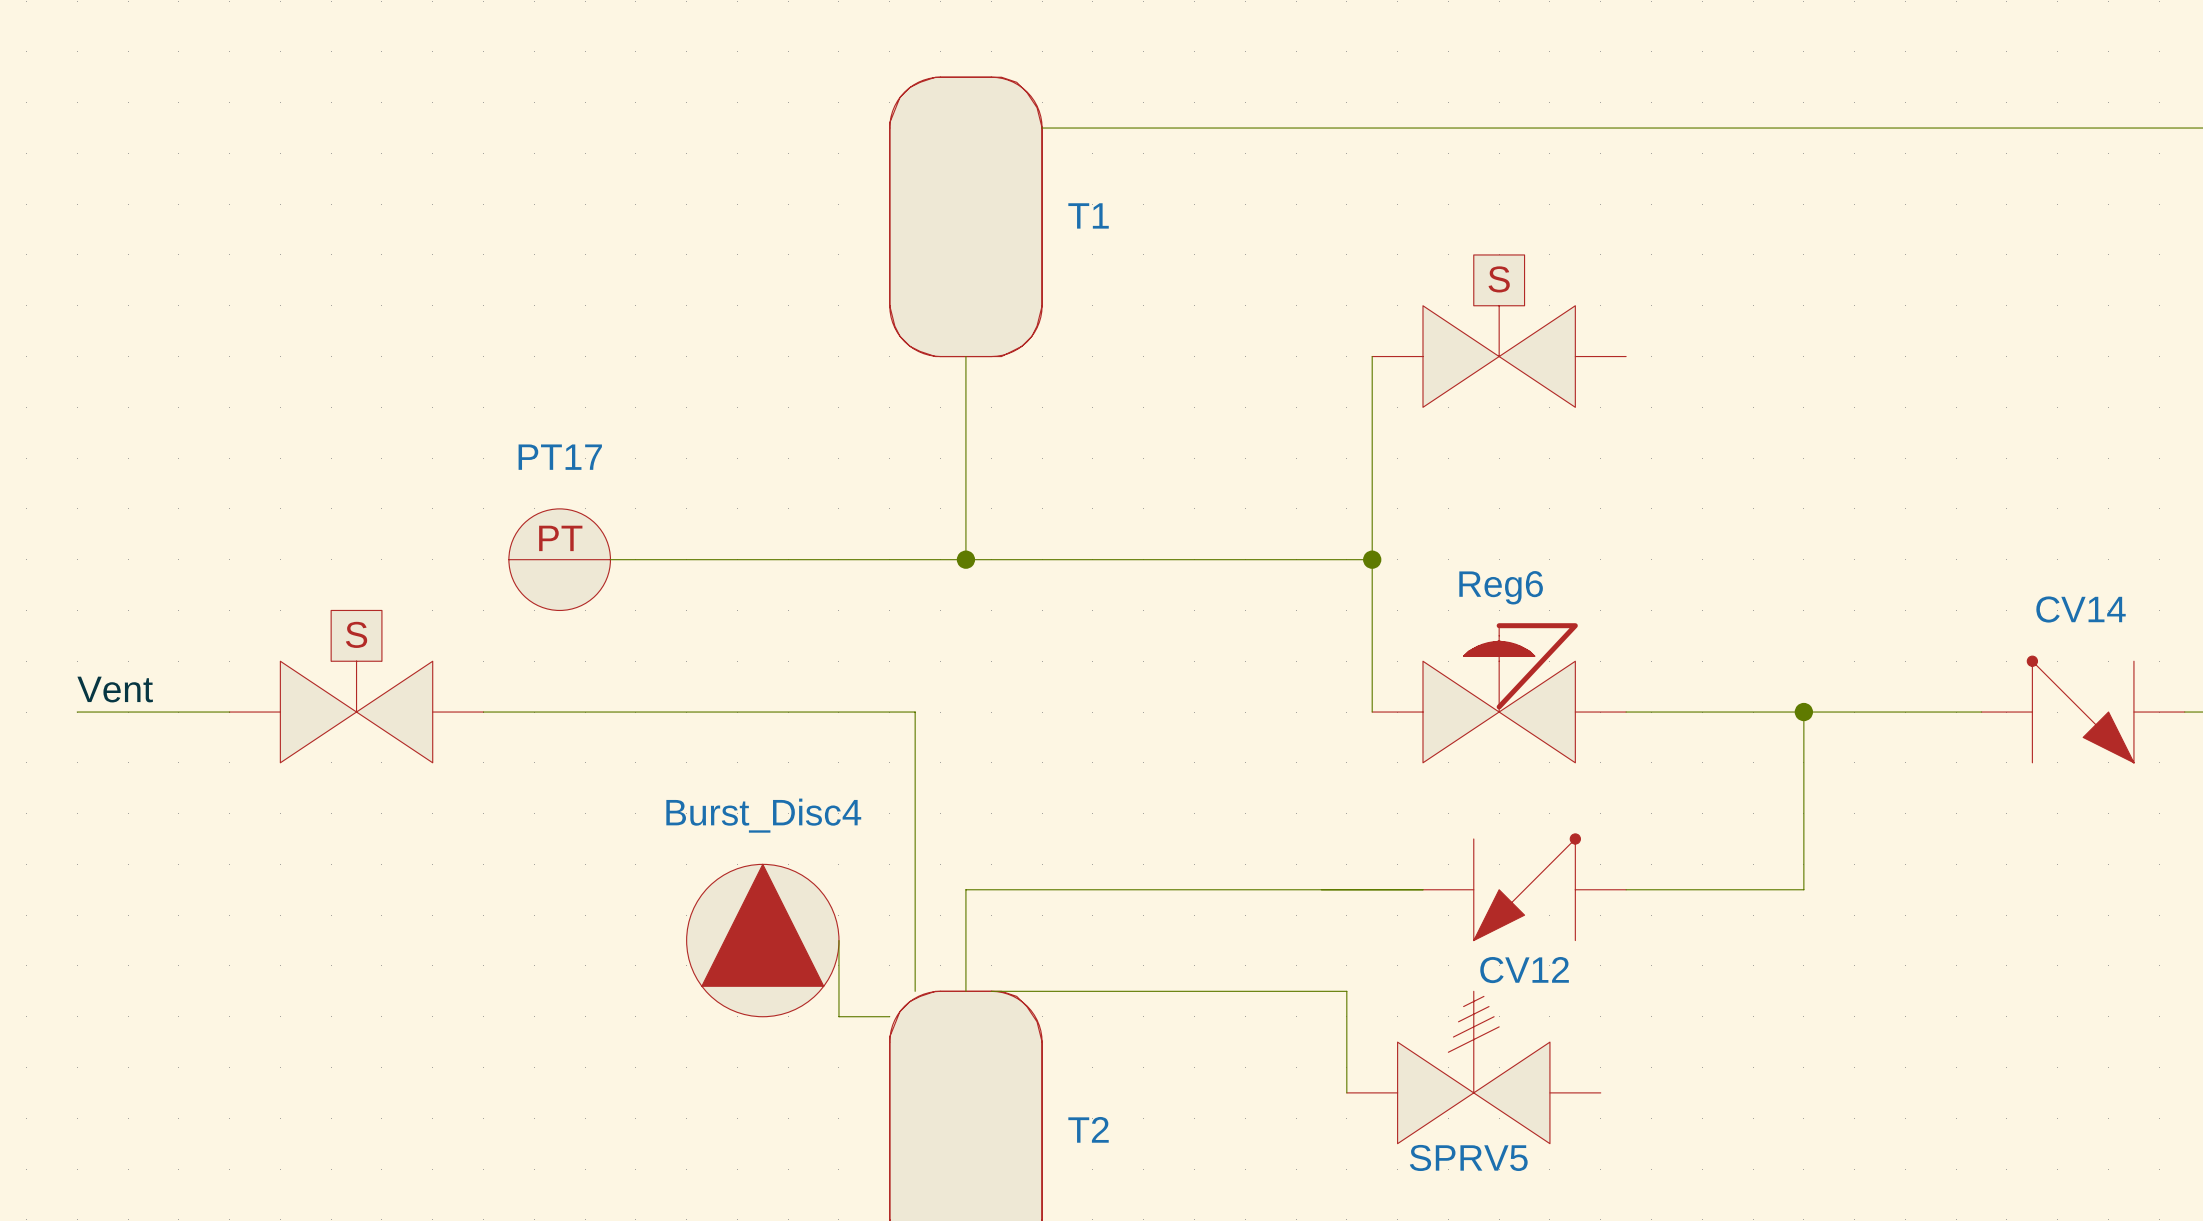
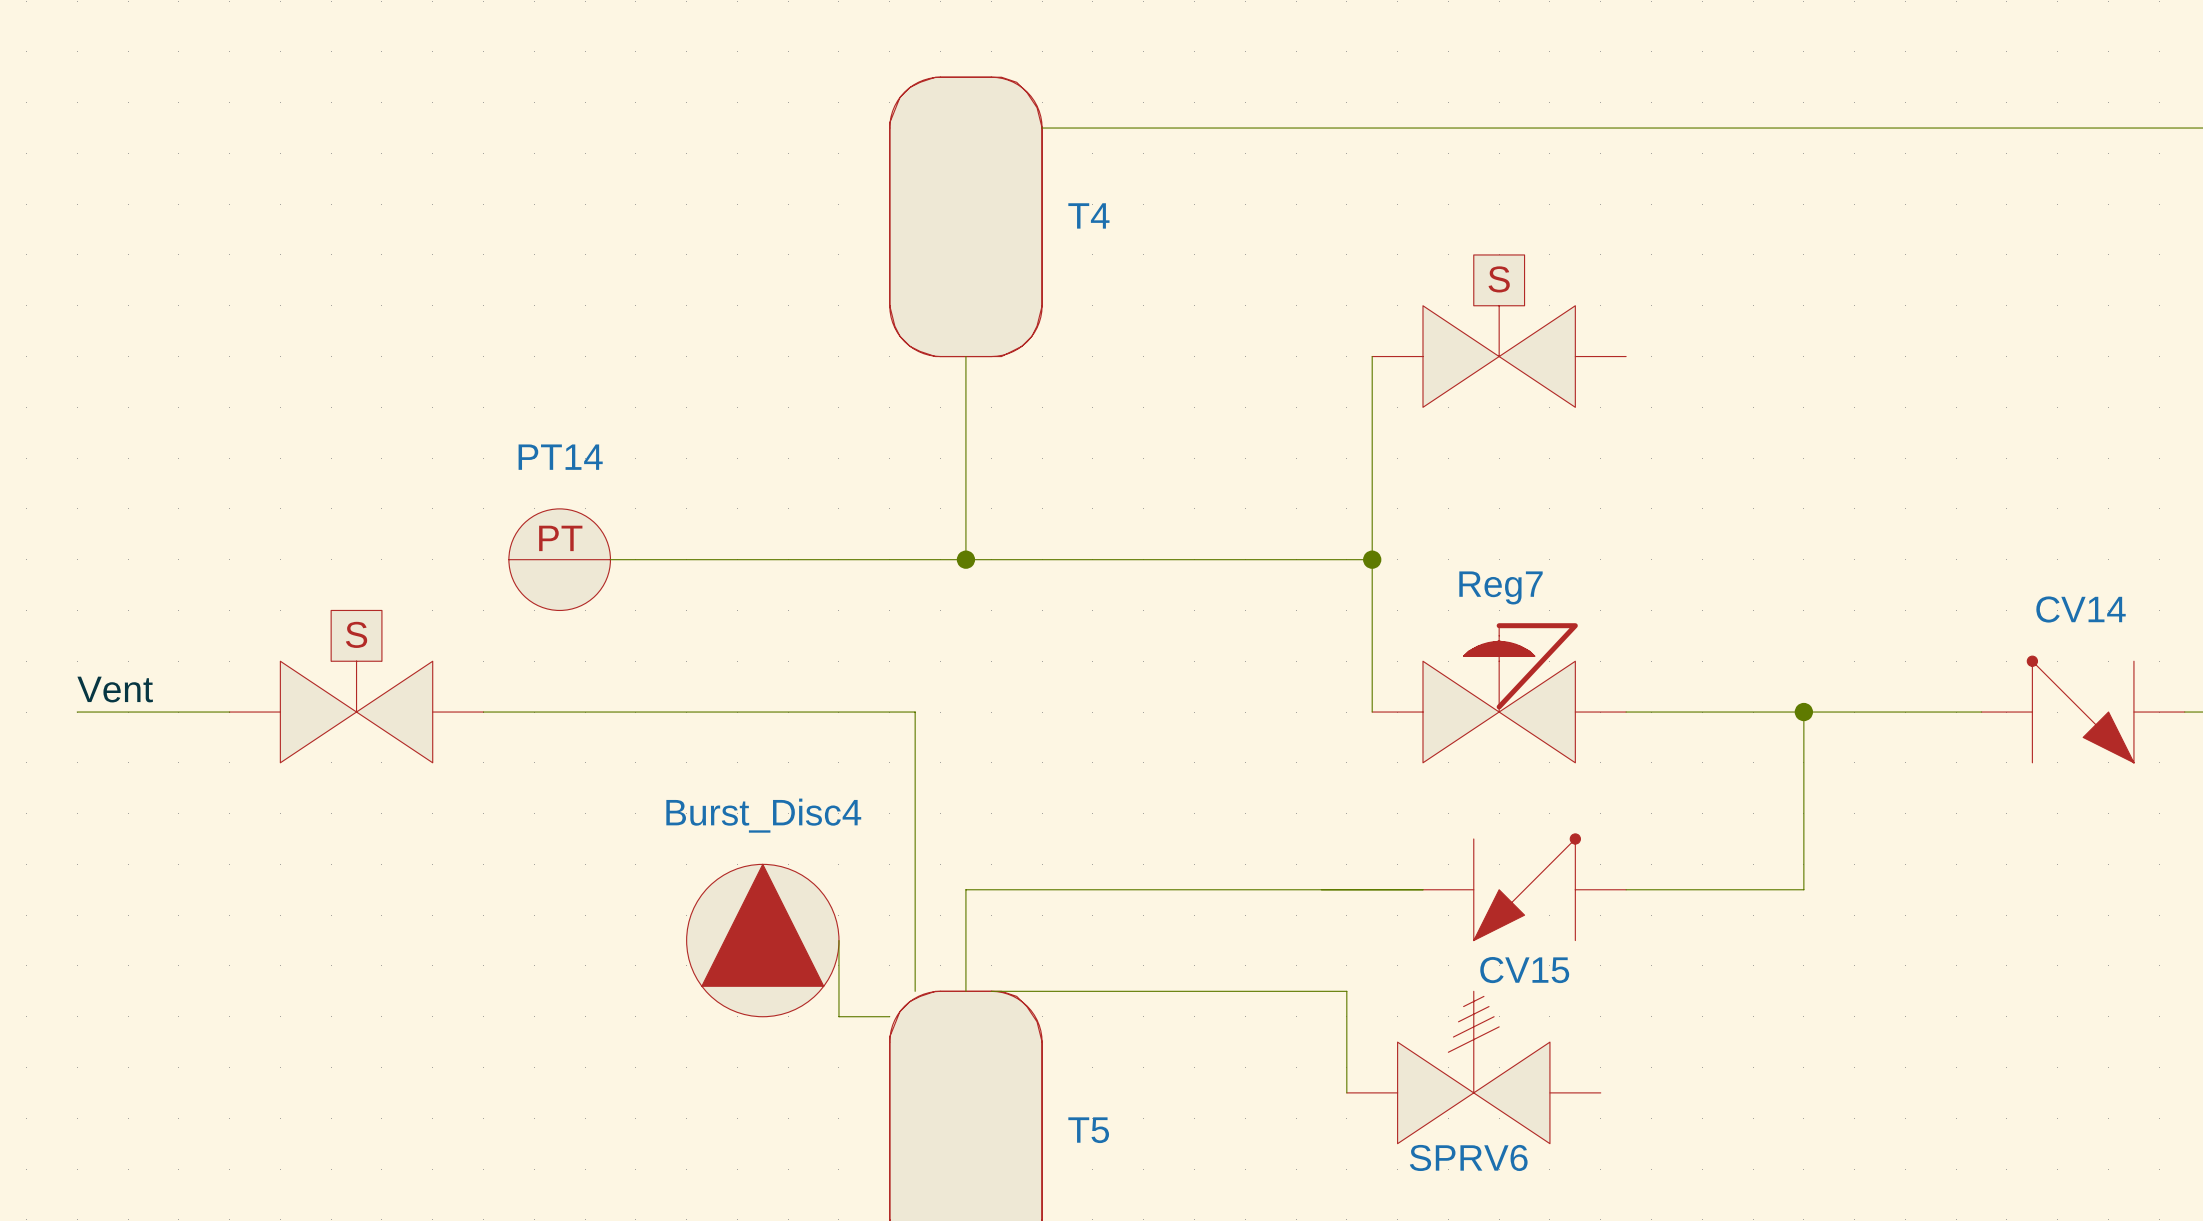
T1 name: T1 (1088, 215) -> T4 (1088, 215)
PT17 name: PT17 (560, 457) -> PT14 (560, 457)
Reg6 name: Reg6 (1501, 587) -> Reg7 (1501, 587)
CV12 name: CV12 (1524, 970) -> CV15 (1524, 970)
T2 name: T2 (1088, 1129) -> T5 (1088, 1130)
SPRV5 name: SPRV5 (1468, 1157) -> SPRV6 (1468, 1157)

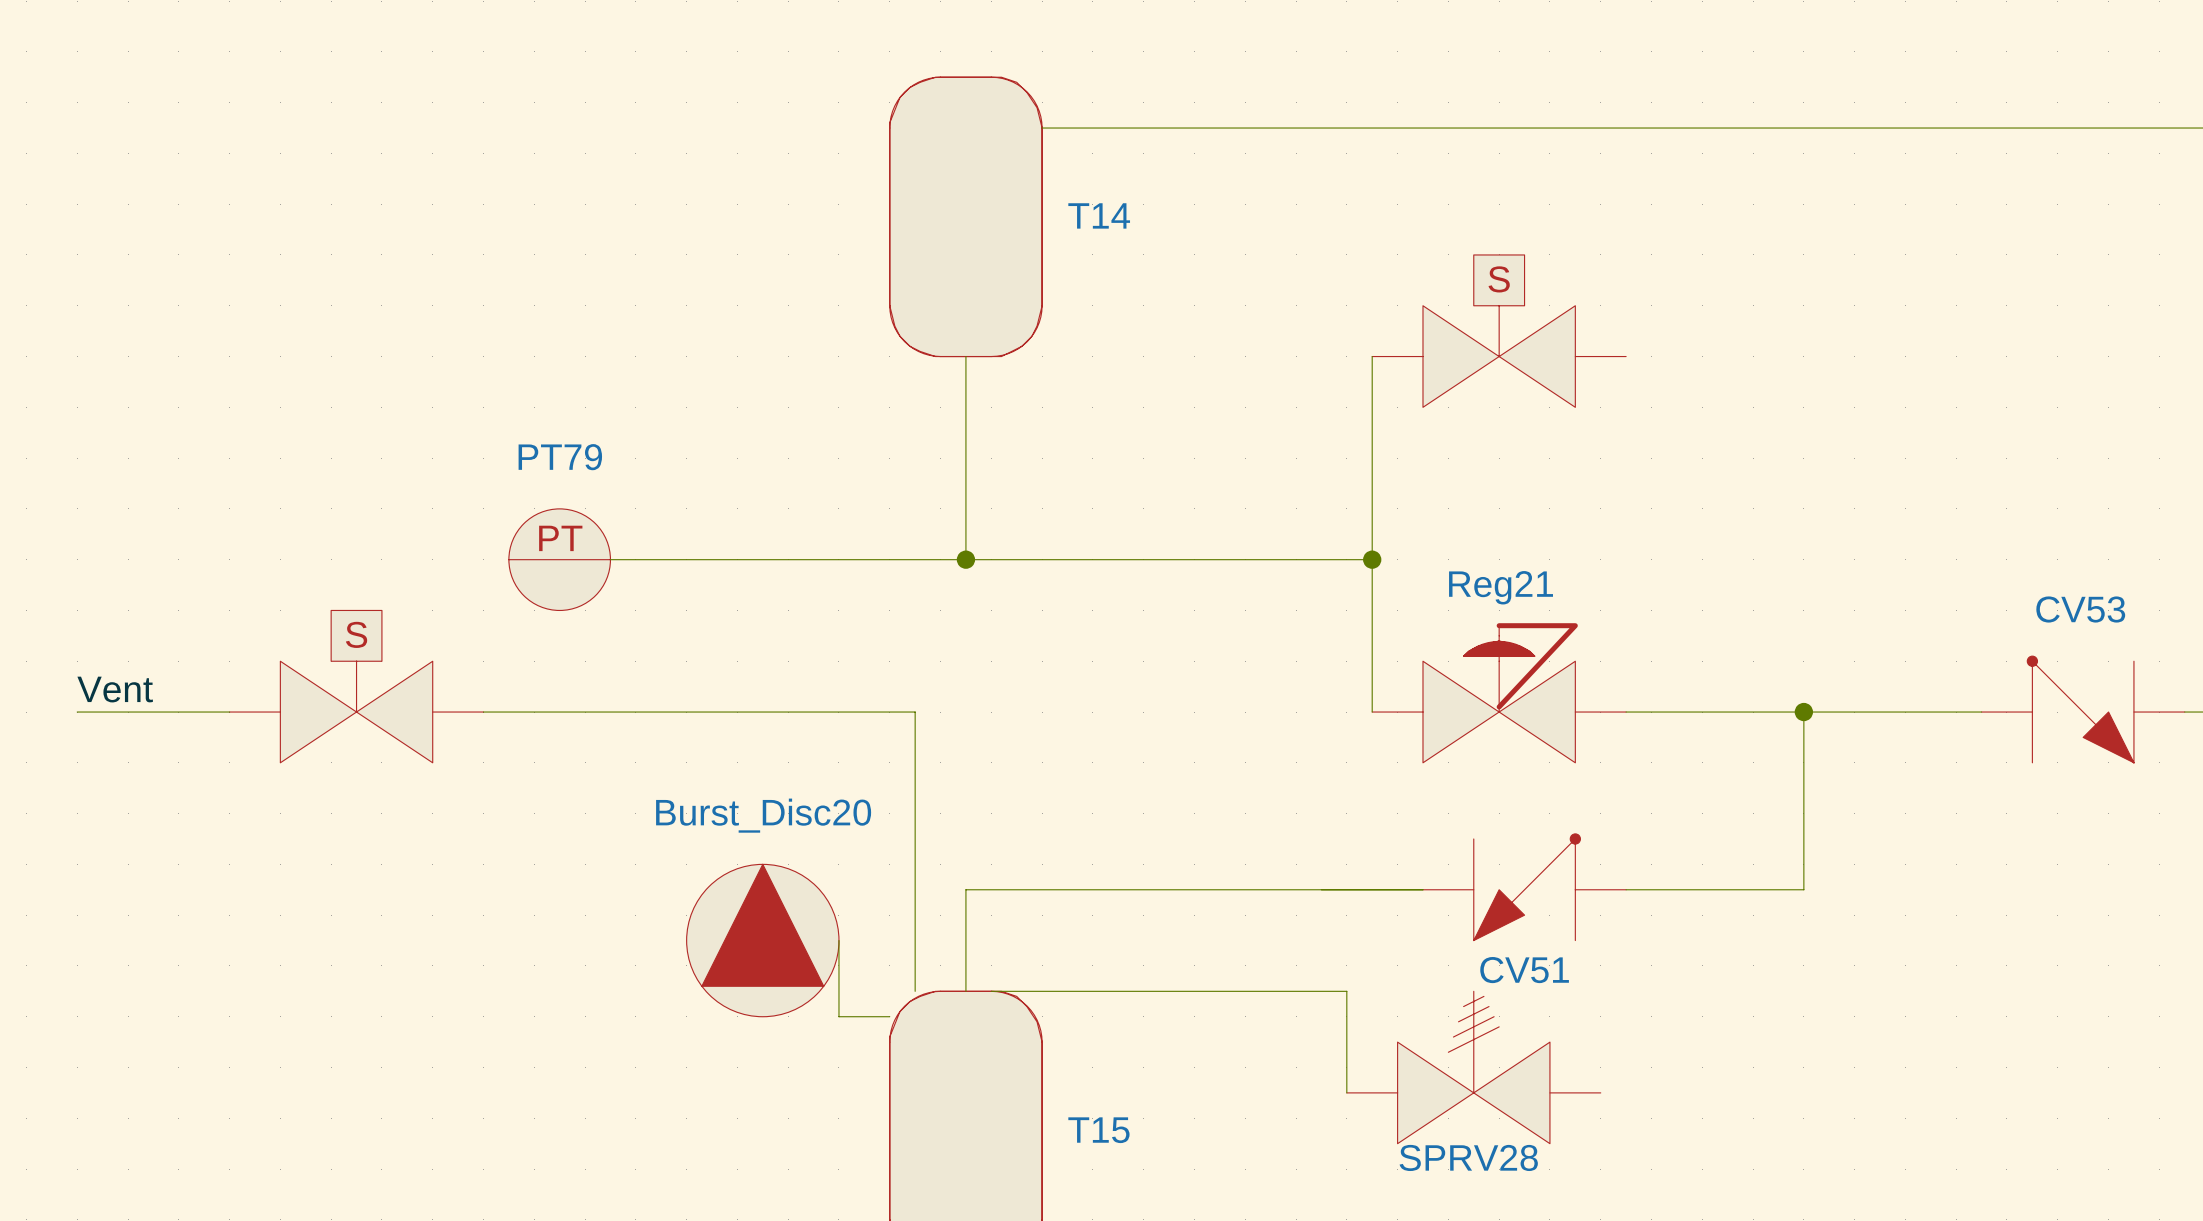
T4 name: T4 (1088, 215) -> T14 (1099, 215)
PT14 name: PT14 (560, 457) -> PT79 (560, 457)
Reg7 name: Reg7 (1501, 587) -> Reg21 (1501, 587)
CV14 name: CV14 (2081, 609) -> CV53 (2080, 609)
Burst_Disc4 name: Burst_Disc4 (763, 815) -> Burst_Disc20 (763, 815)
CV15 name: CV15 (1524, 970) -> CV51 (1524, 970)
T5 name: T5 (1088, 1130) -> T15 (1098, 1130)
SPRV6 name: SPRV6 (1468, 1157) -> SPRV28 (1468, 1157)

